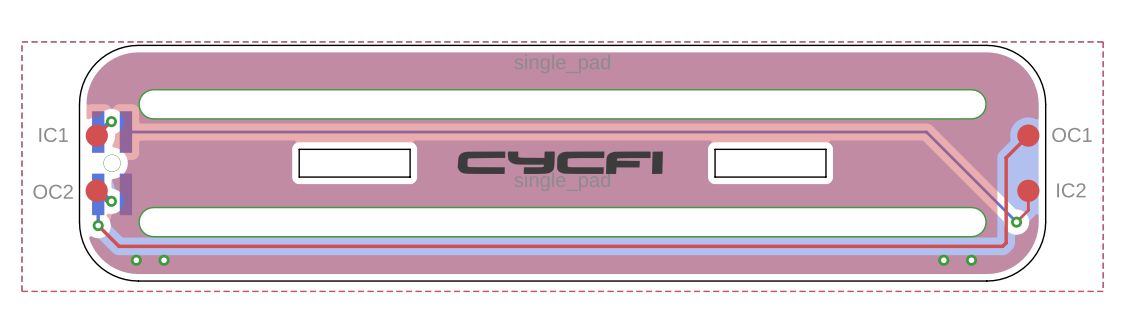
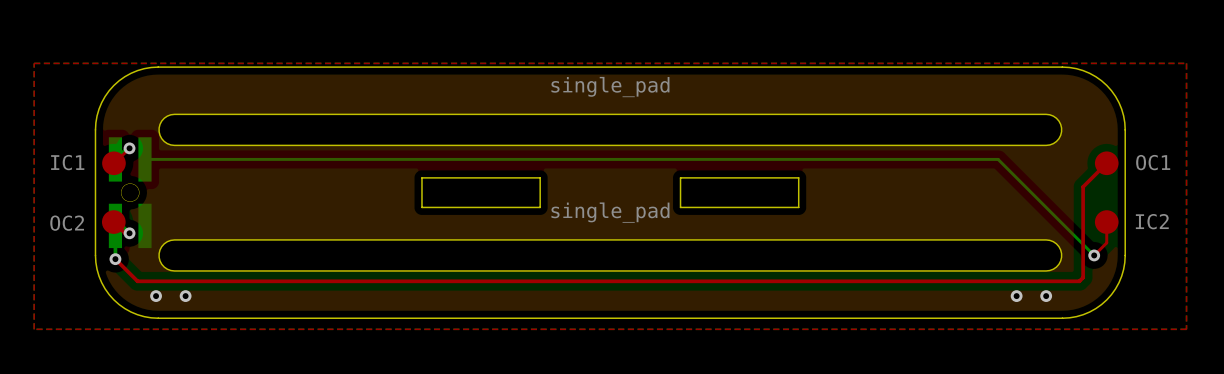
board edge: (385, 149) (299, 149) (299, 177) (385, 177) -> (421, 177) (421, 207)
board edge: (410, 149) (410, 177) -> (447, 177) (540, 177) (540, 207) (447, 207)
board edge: (715, 149) (715, 177) -> (772, 177) (680, 177) (680, 207) (772, 207)
board edge: (739, 149) (825, 149) (825, 177) (739, 177) -> (798, 177) (798, 207)
drawing: [457, 151, 663, 175] -> none

